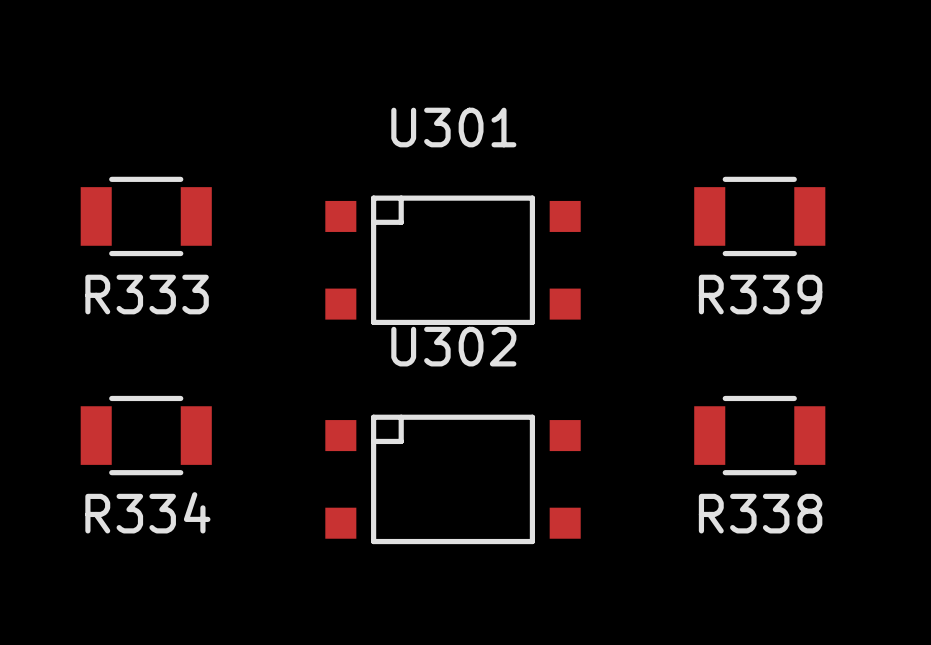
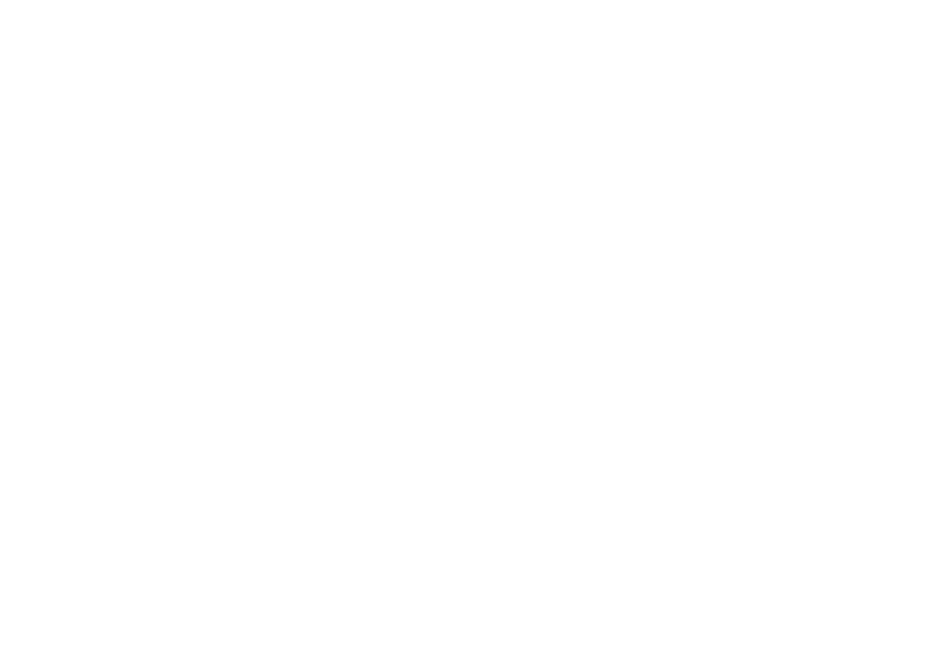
R333: (146, 216) -> none
R339: (759, 216) -> none
U301: (453, 260) -> none
R334: (146, 435) -> none
R338: (759, 435) -> none
U302: (453, 479) -> none

